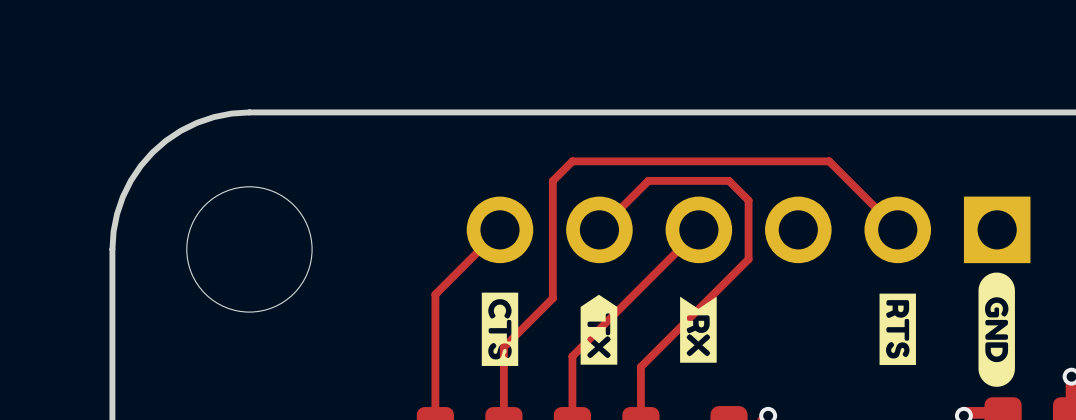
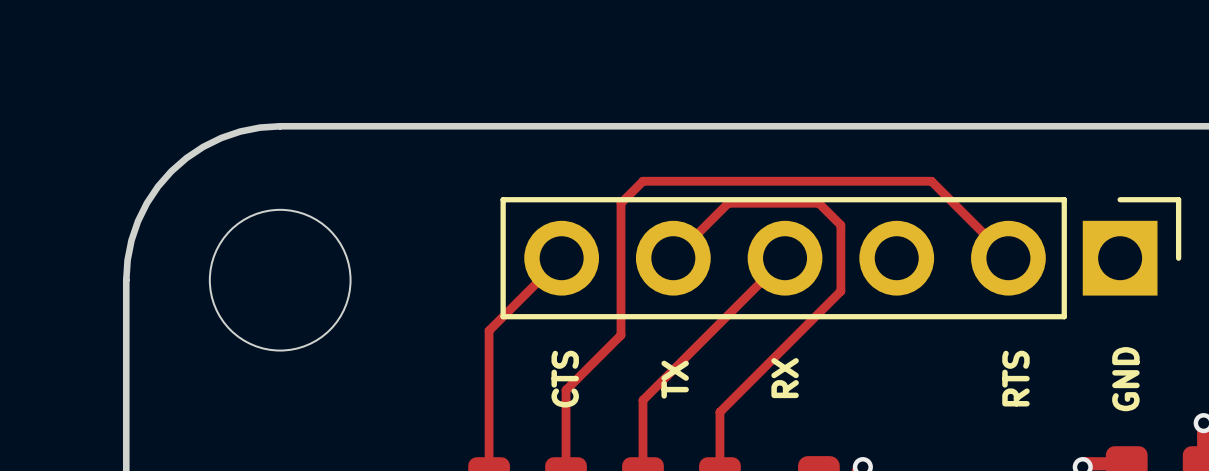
part footprint: [466, 196, 1031, 264] -> [500, 197, 1182, 320]
drawing: [978, 272, 1015, 387] -> none
drawing: [481, 292, 519, 366] -> none
drawing: [879, 293, 916, 365] -> none
drawing: [580, 294, 618, 365] -> none
drawing: [680, 296, 717, 363] -> none
text: none -> RX (785, 378)
text: none -> CTS (565, 379)
text: none -> TX (675, 379)
text: none -> RTS (1015, 378)
text: none -> GND (1125, 379)

